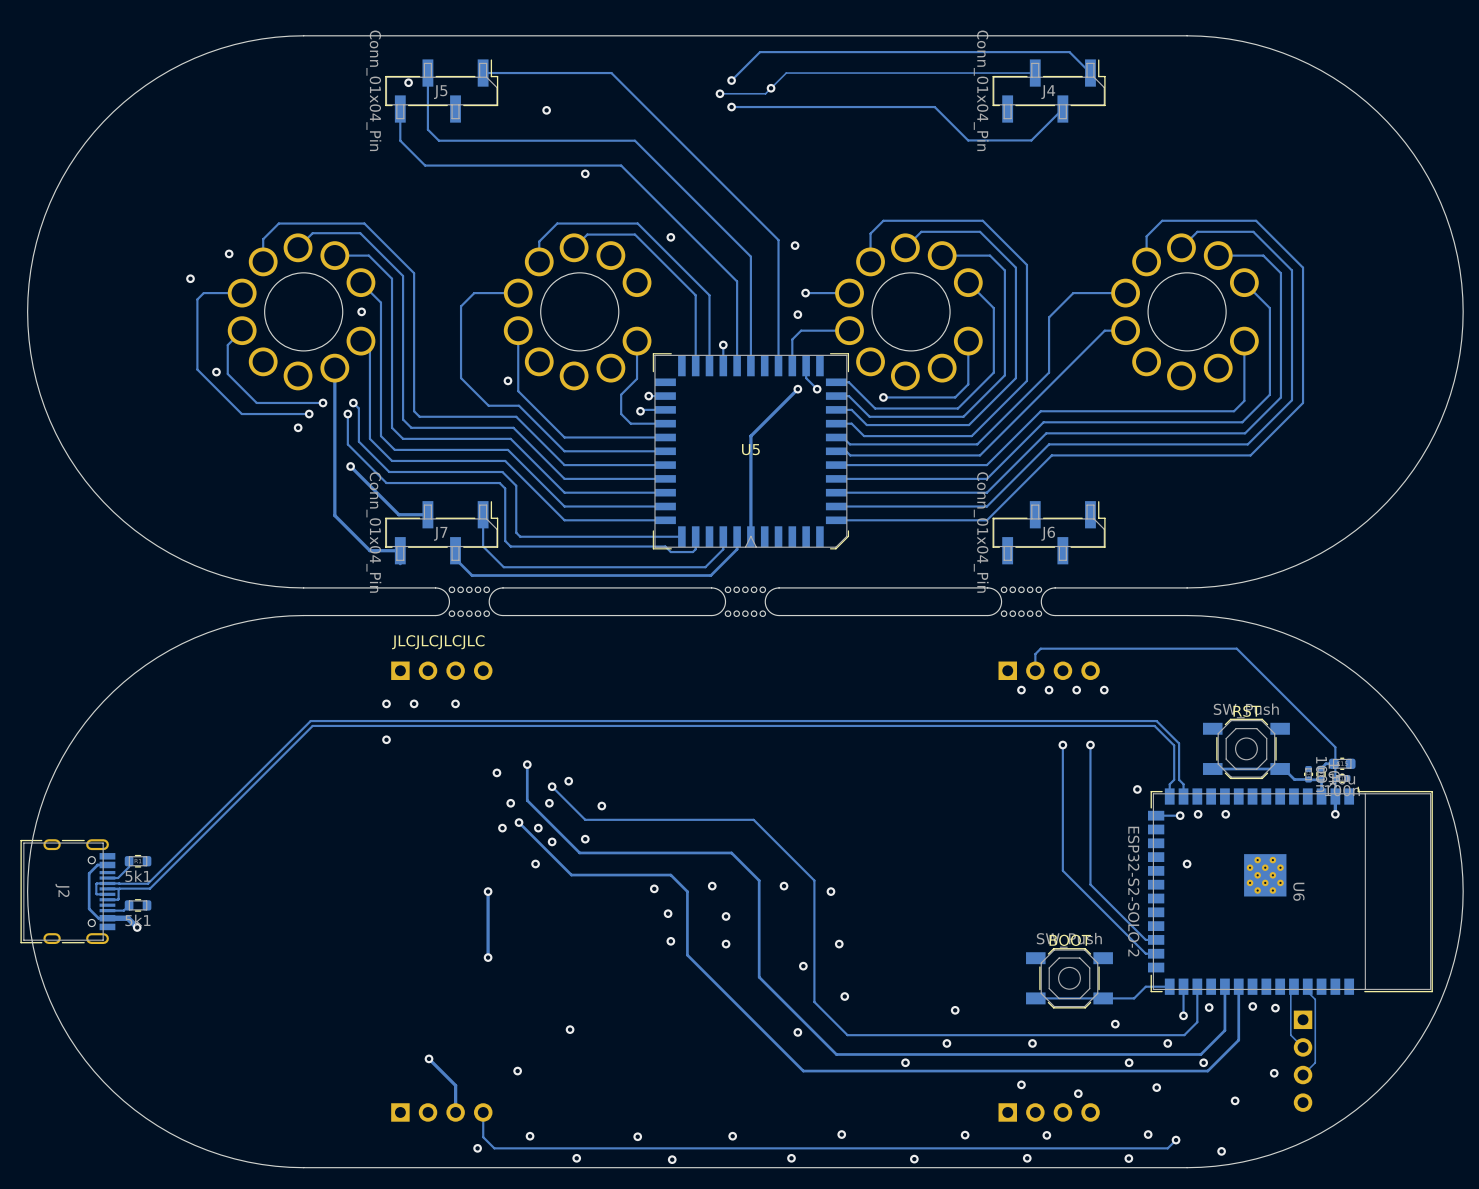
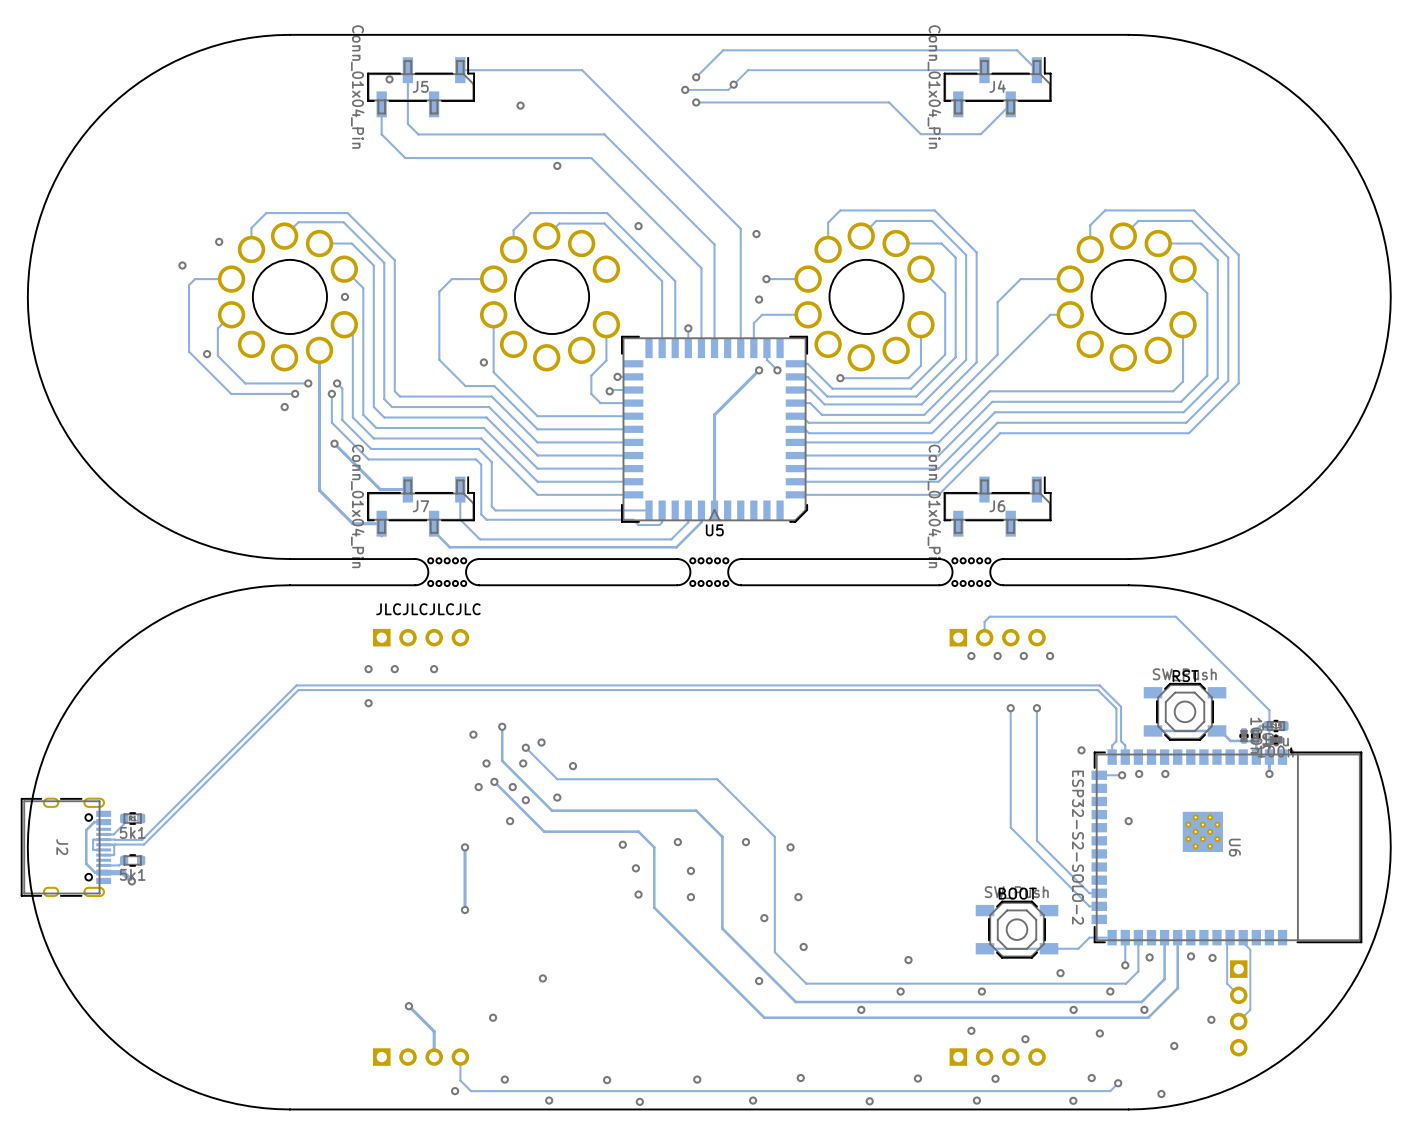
U5 name position: U5 (750, 449) -> U5 (714, 530)

